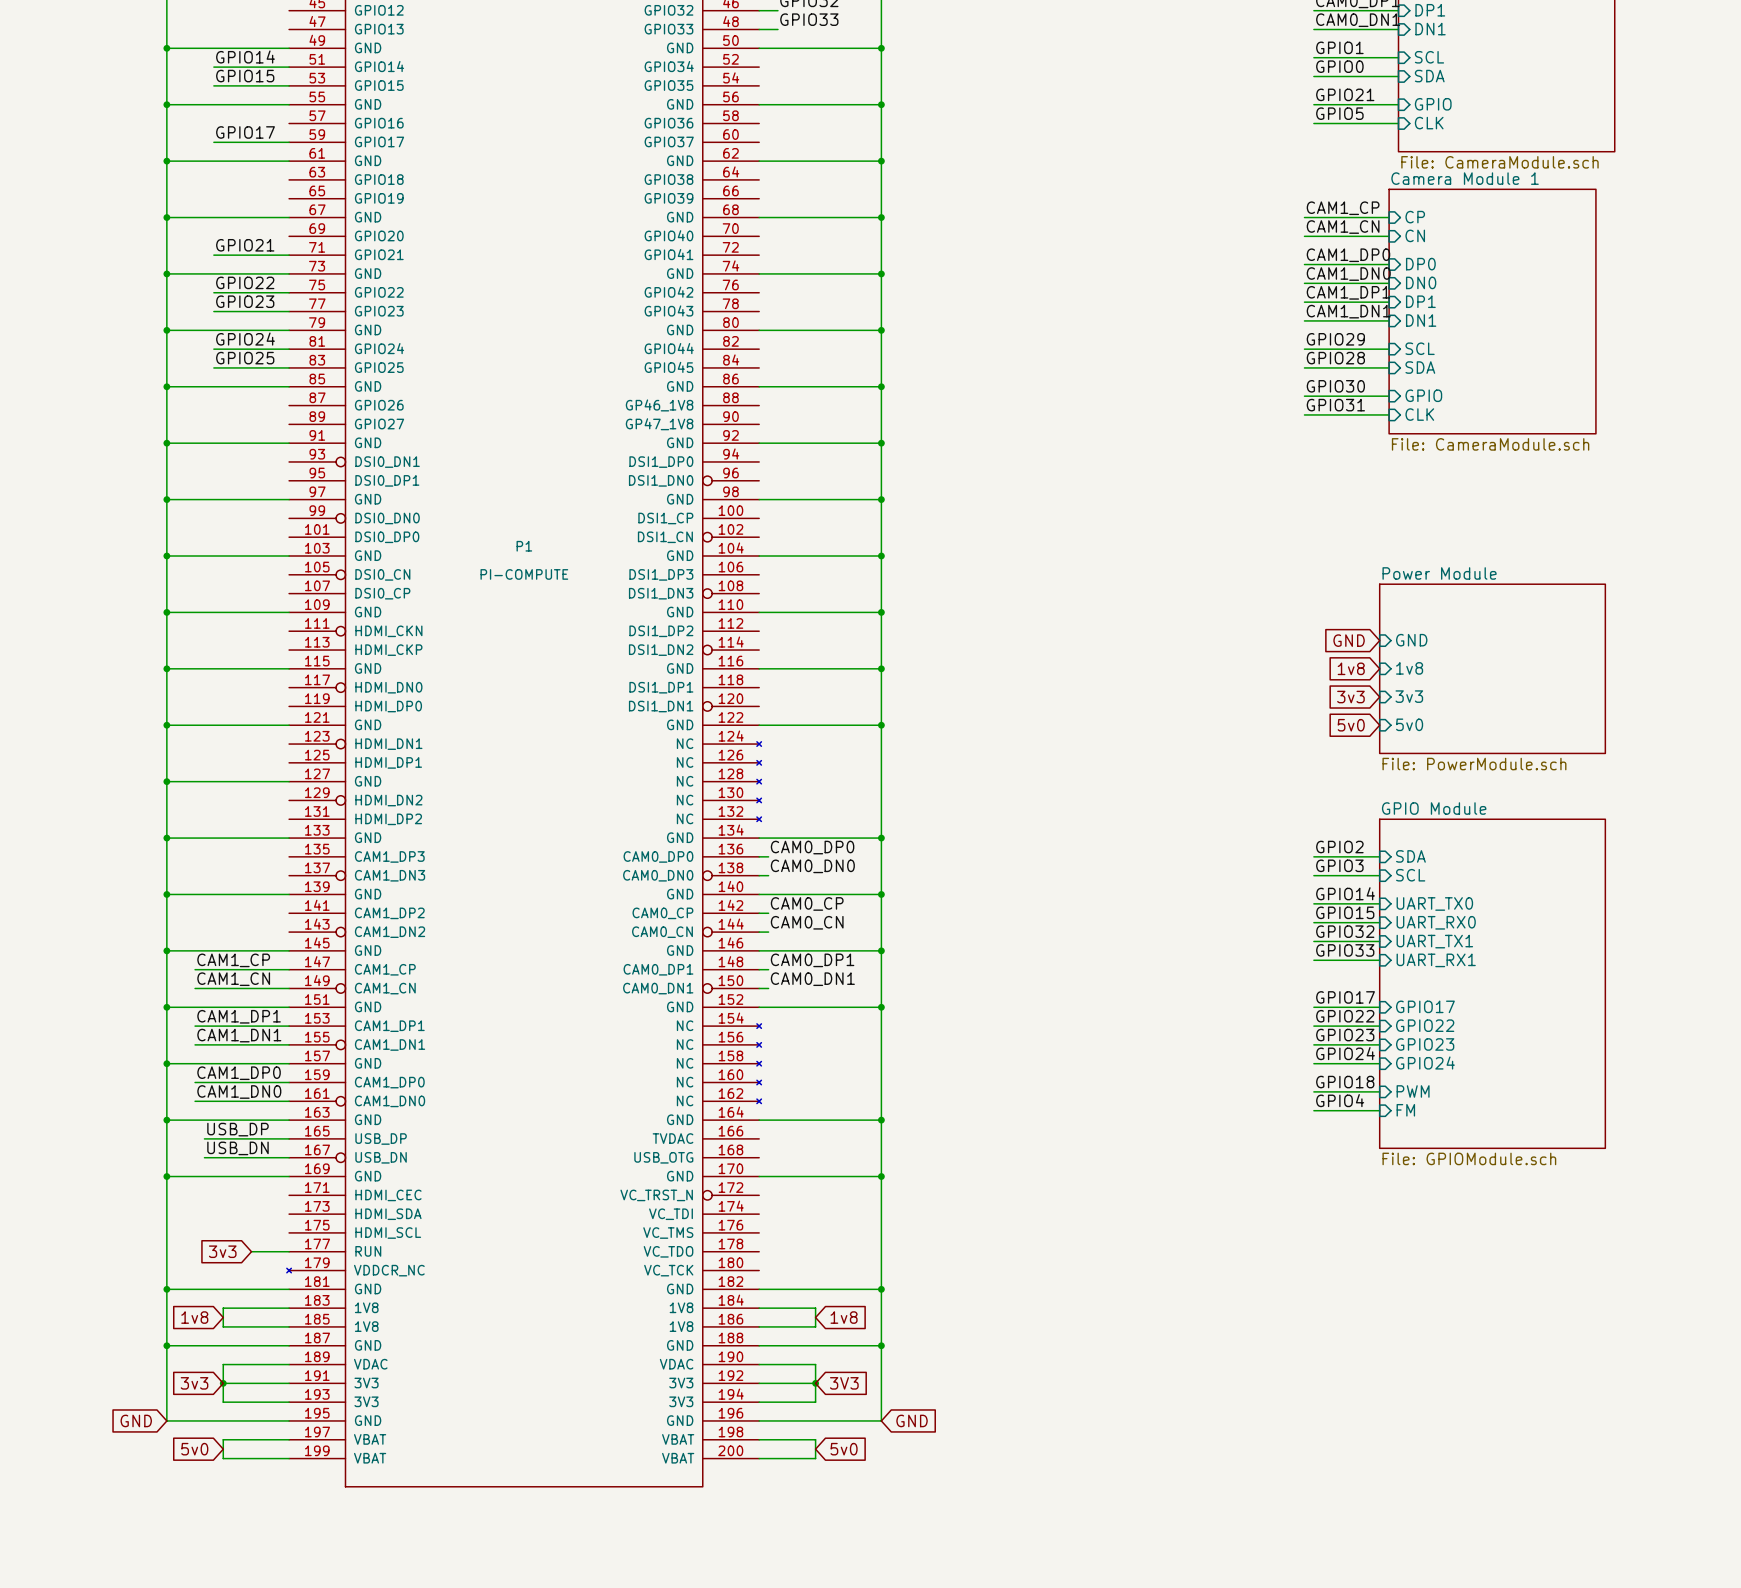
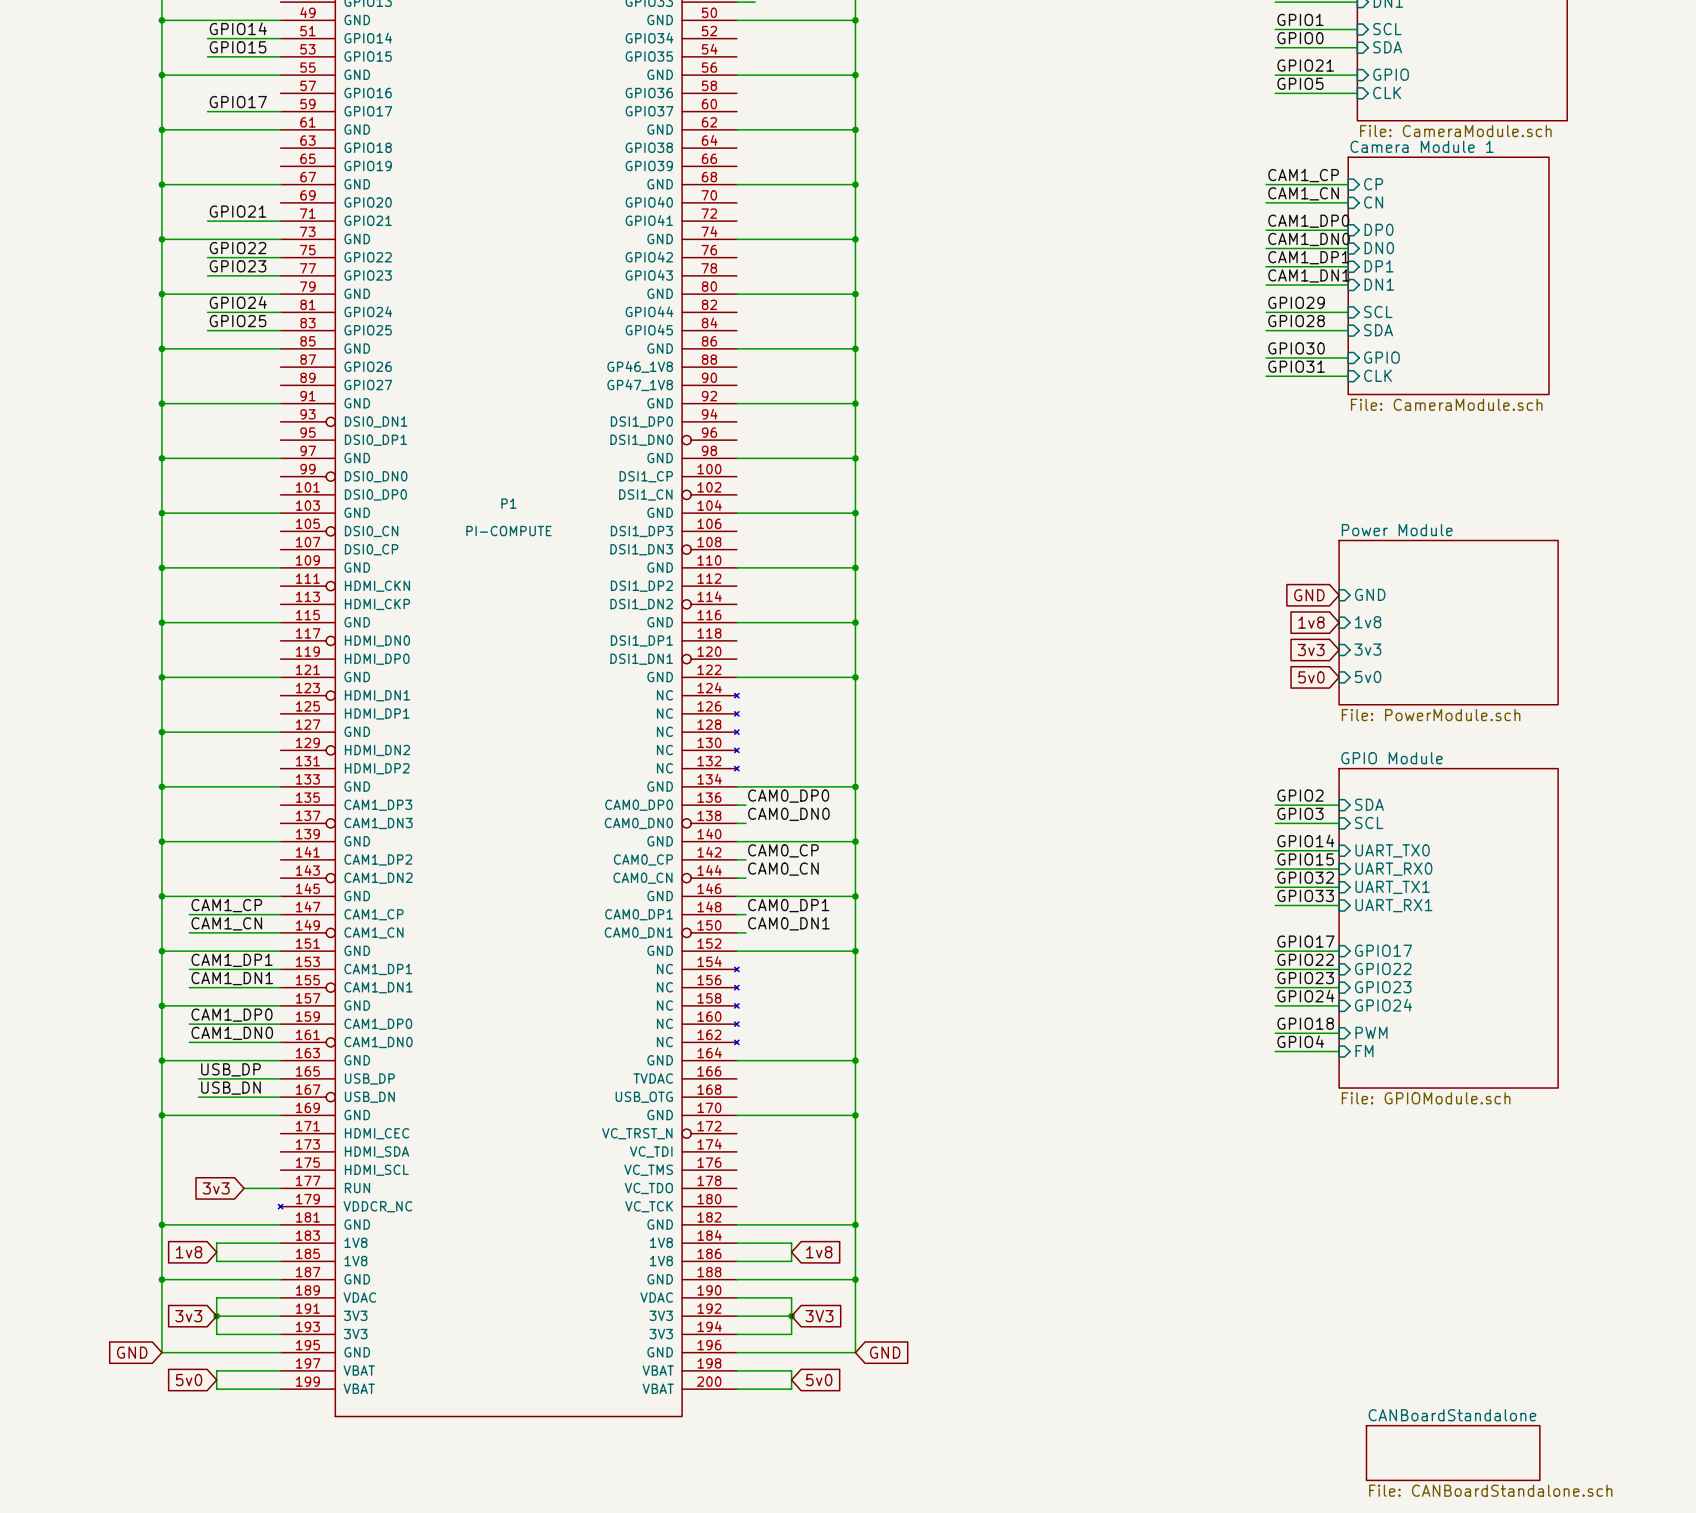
sheet CANBoardStandalone: none -> File: CANBoardStandalone.sch (1453, 1453)

